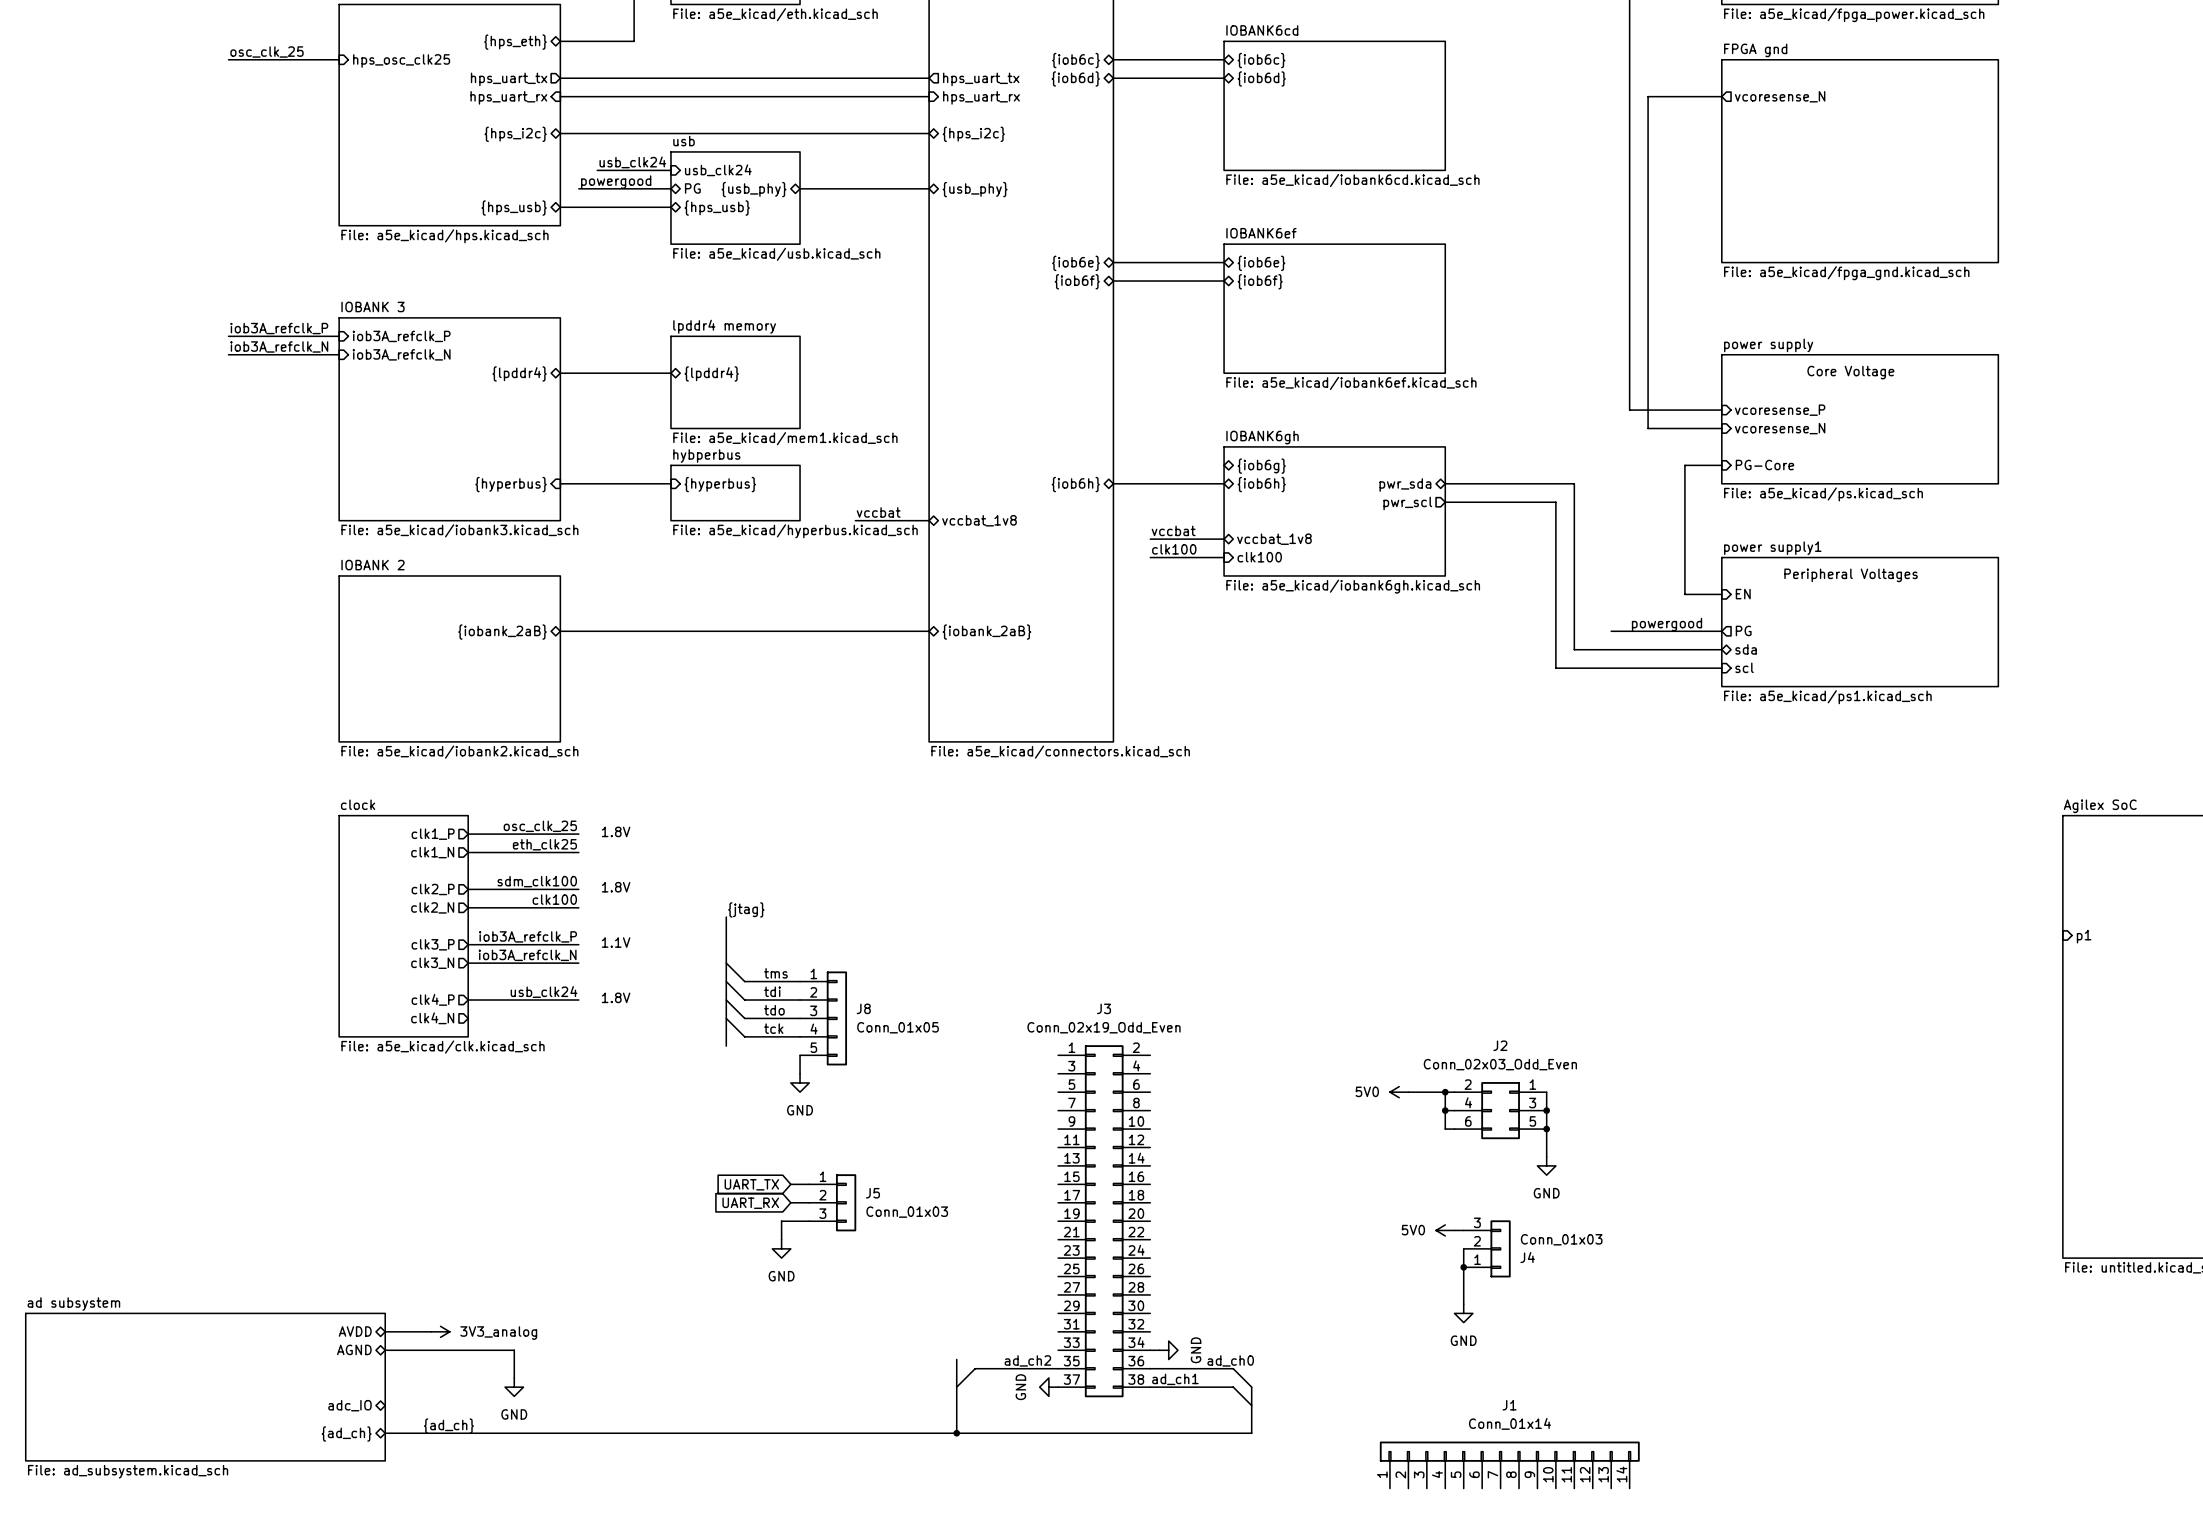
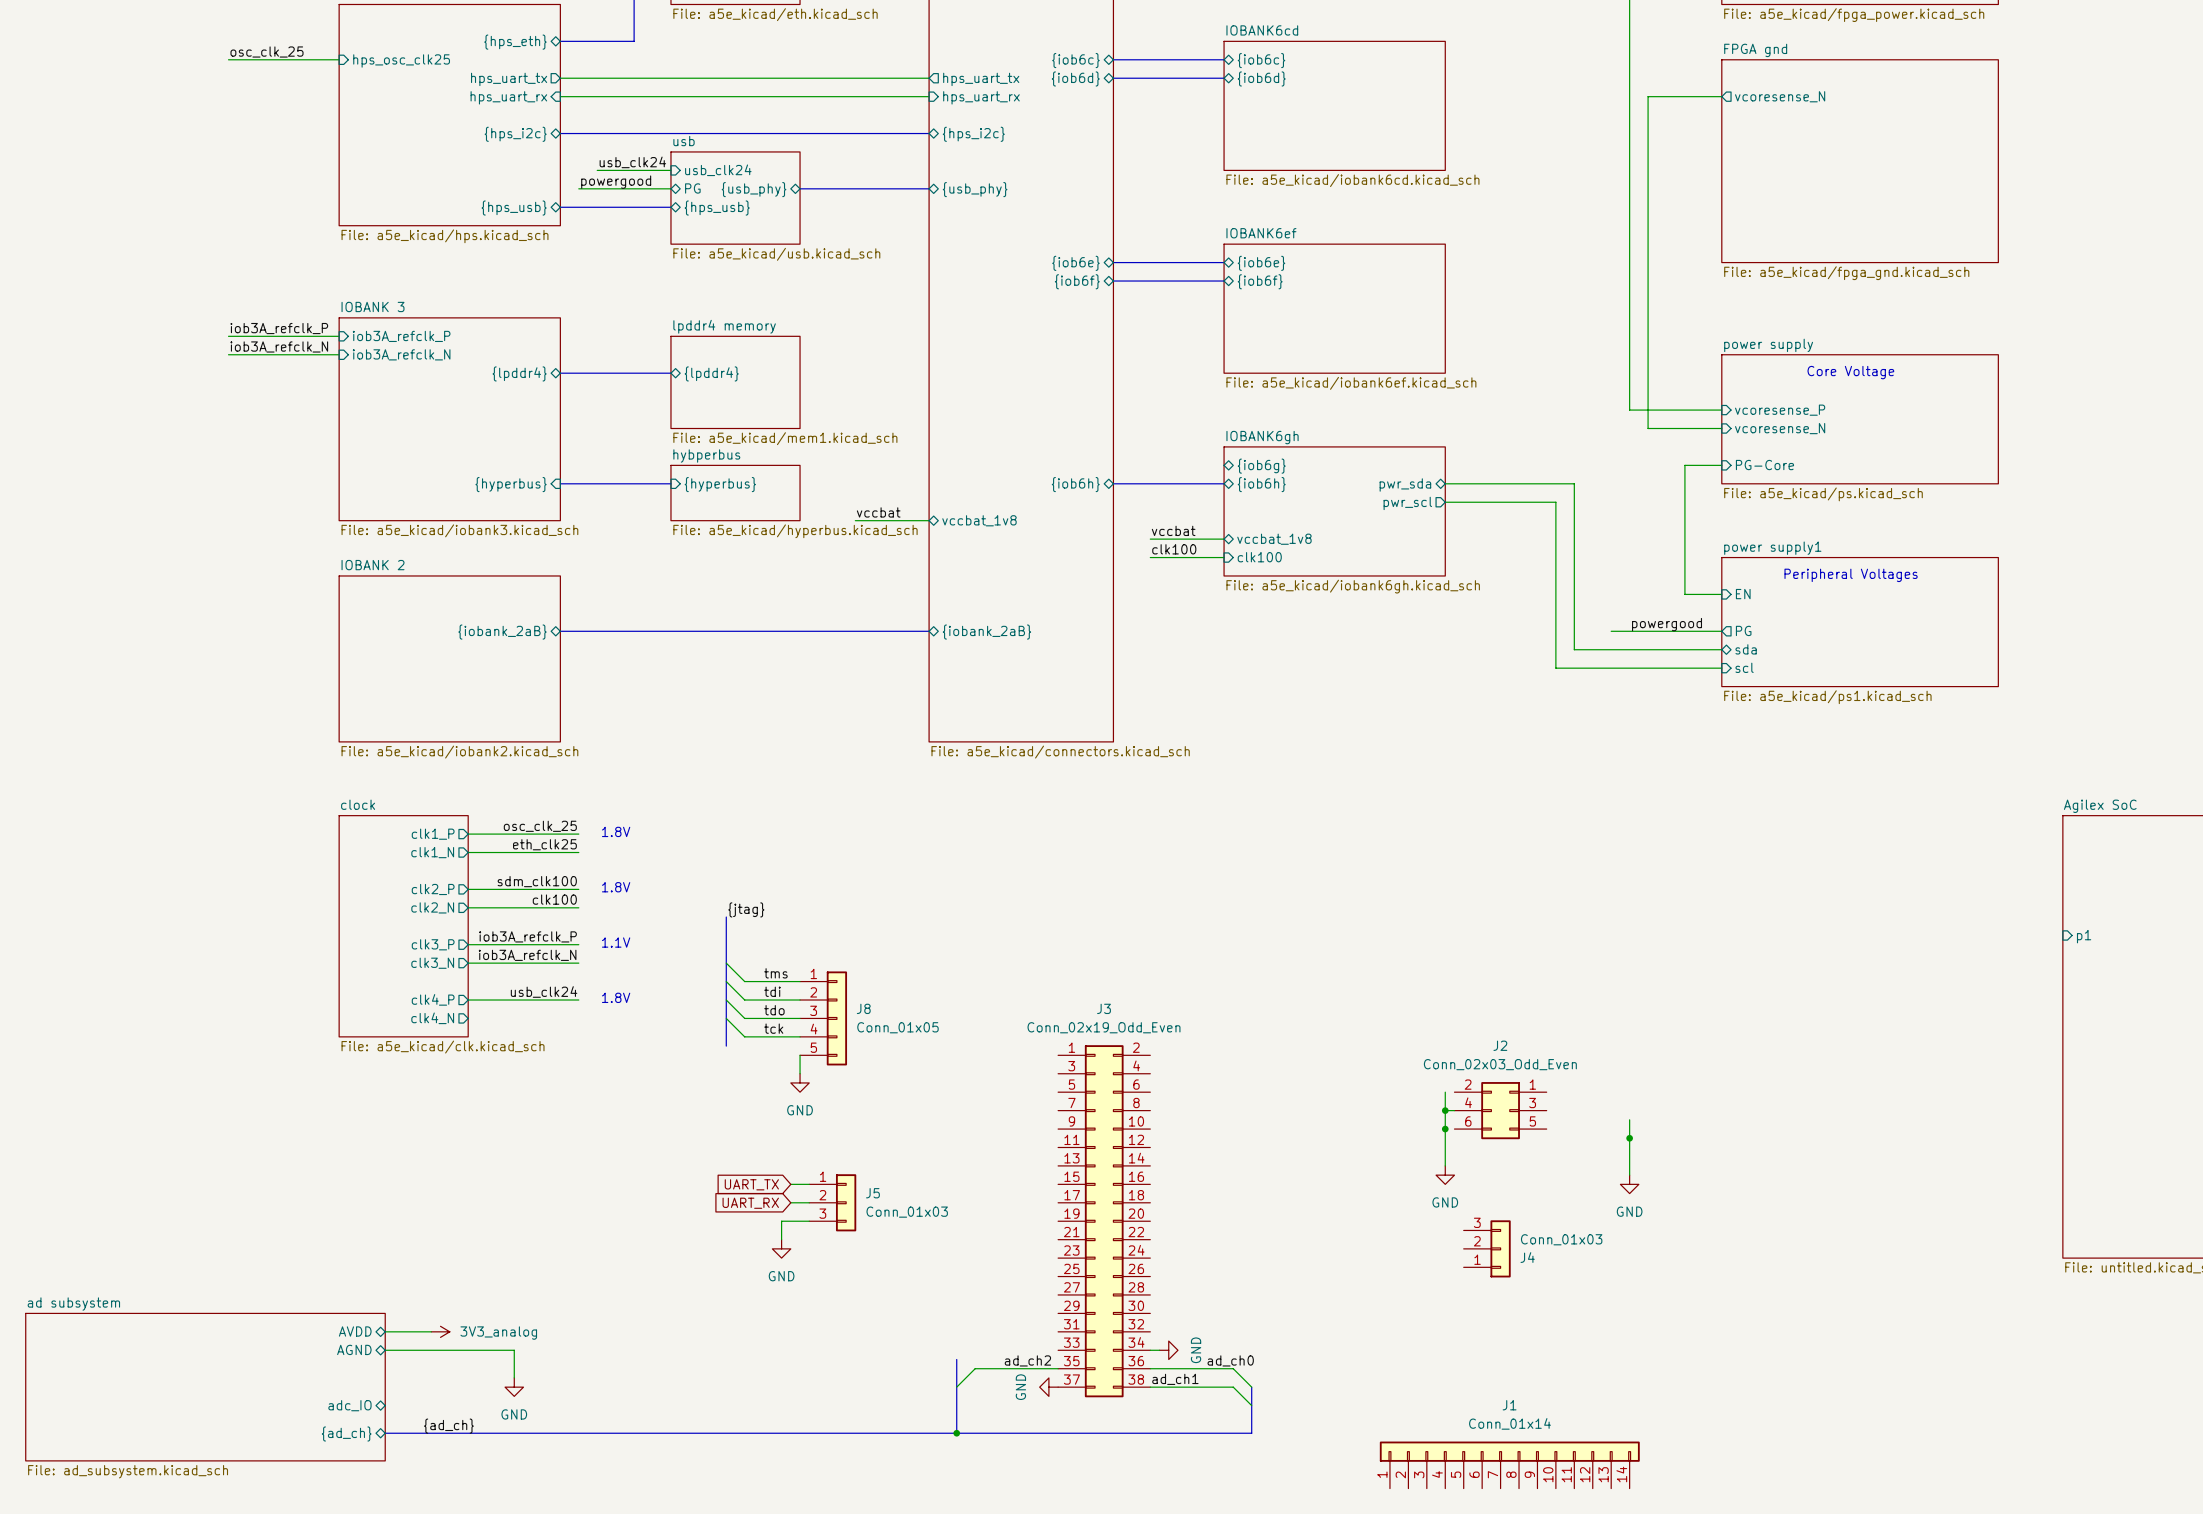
power symbol: 5V0 (1399, 1092) -> none
wire: (1408, 1092) (1454, 1092) -> none
junction position: (1445, 1092) -> (1445, 1129)
wire: (1546, 1092) (1546, 1156) -> none
junction: (1546, 1110) -> none
wire: none -> (1629, 1119) (1629, 1175)
wire: (1445, 1129) (1454, 1129) -> (1445, 1129) (1445, 1165)
junction: (1546, 1129) -> none
junction: none -> (1629, 1138)
power symbol: GND (1546, 1165) -> none
power symbol: none -> GND (1445, 1175)
power symbol: none -> GND (1629, 1184)
power symbol: 5V0 (1445, 1230) -> none
wire: (1454, 1230) (1463, 1230) -> none
wire: (1463, 1248) (1463, 1304) -> none
junction: (1463, 1267) -> none
power symbol: GND (1463, 1313) -> none

